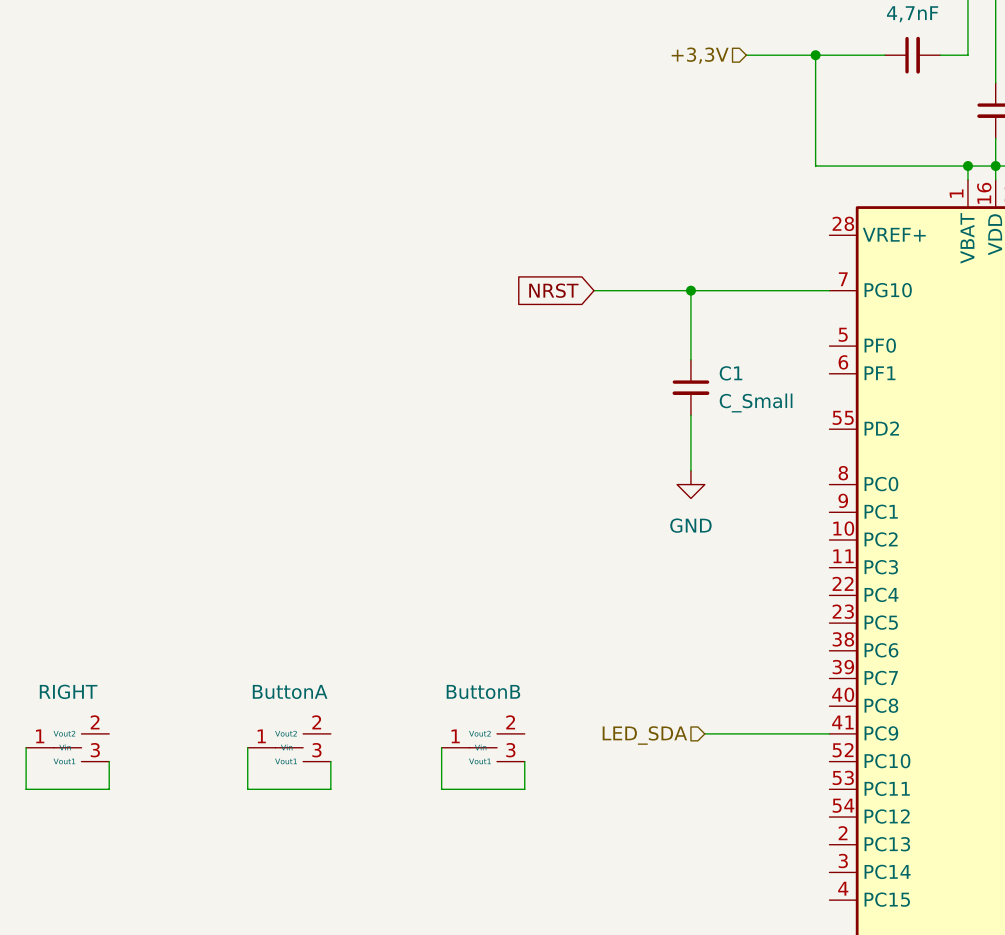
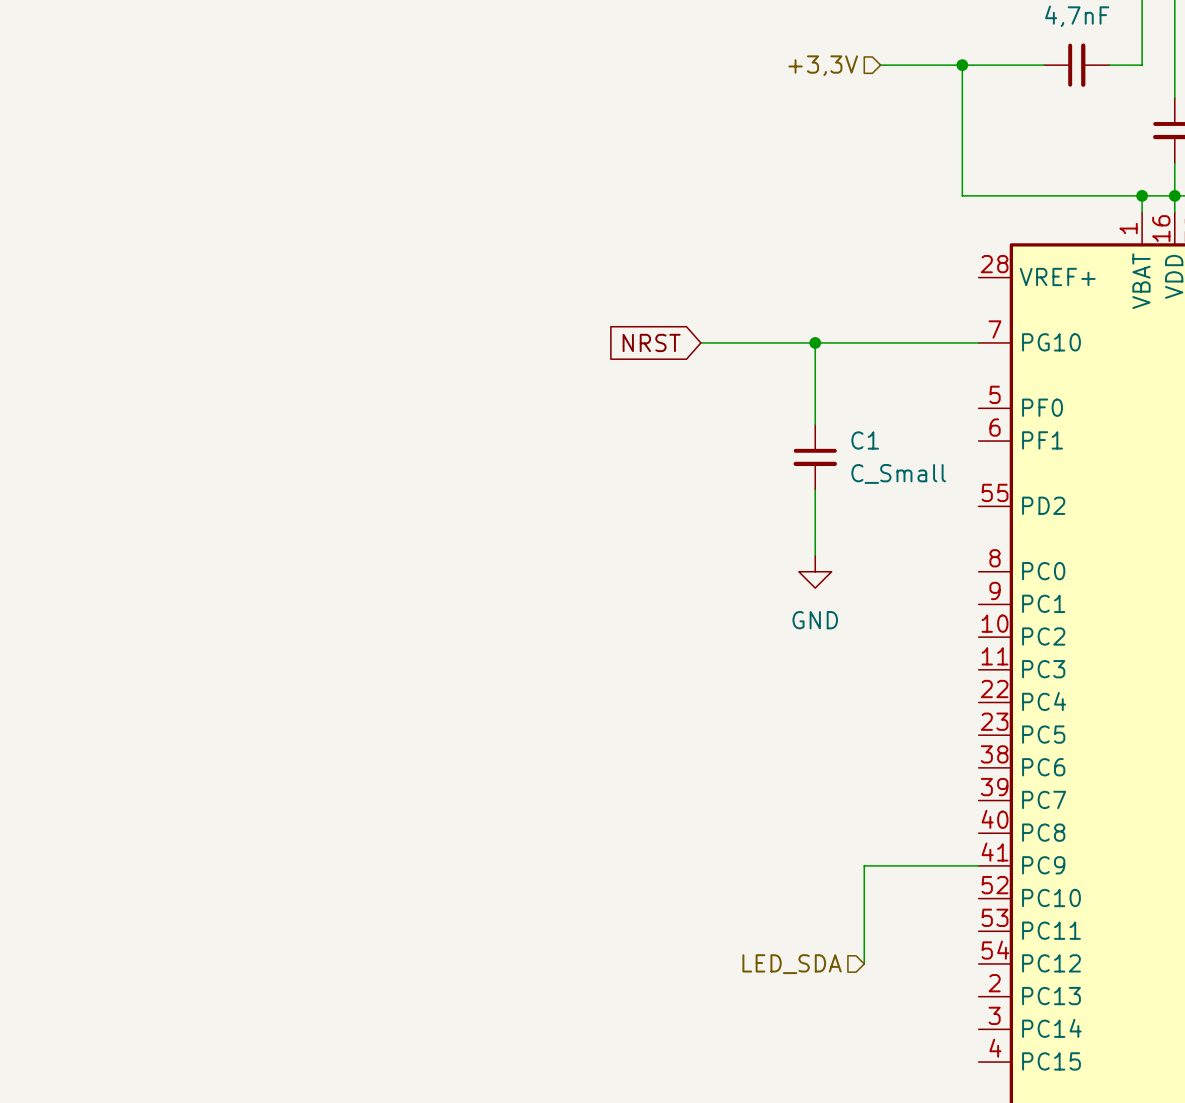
wire: (704, 733) (732, 733) -> (864, 963) (864, 865)
hierarchical label position: LED_SDA (644, 735) -> LED_SDA (792, 964)
wire: (26, 747) (26, 789) (109, 789) (109, 761) -> none
RIGHT: (67, 747) -> none
wire: (247, 747) (247, 789) (330, 789) (330, 761) -> none
ButtonA: (289, 747) -> none
wire: (441, 747) (441, 789) (524, 789) (524, 761) -> none
ButtonB: (483, 747) -> none

